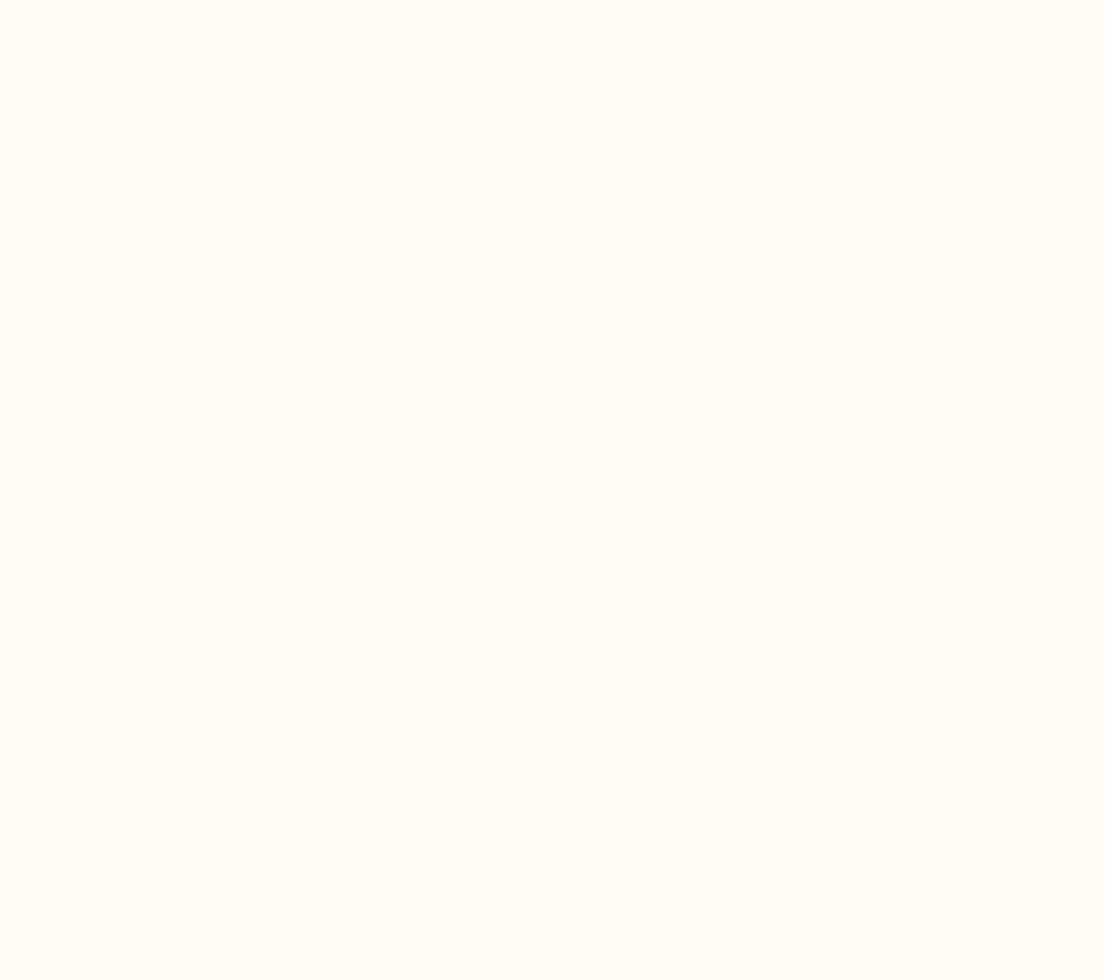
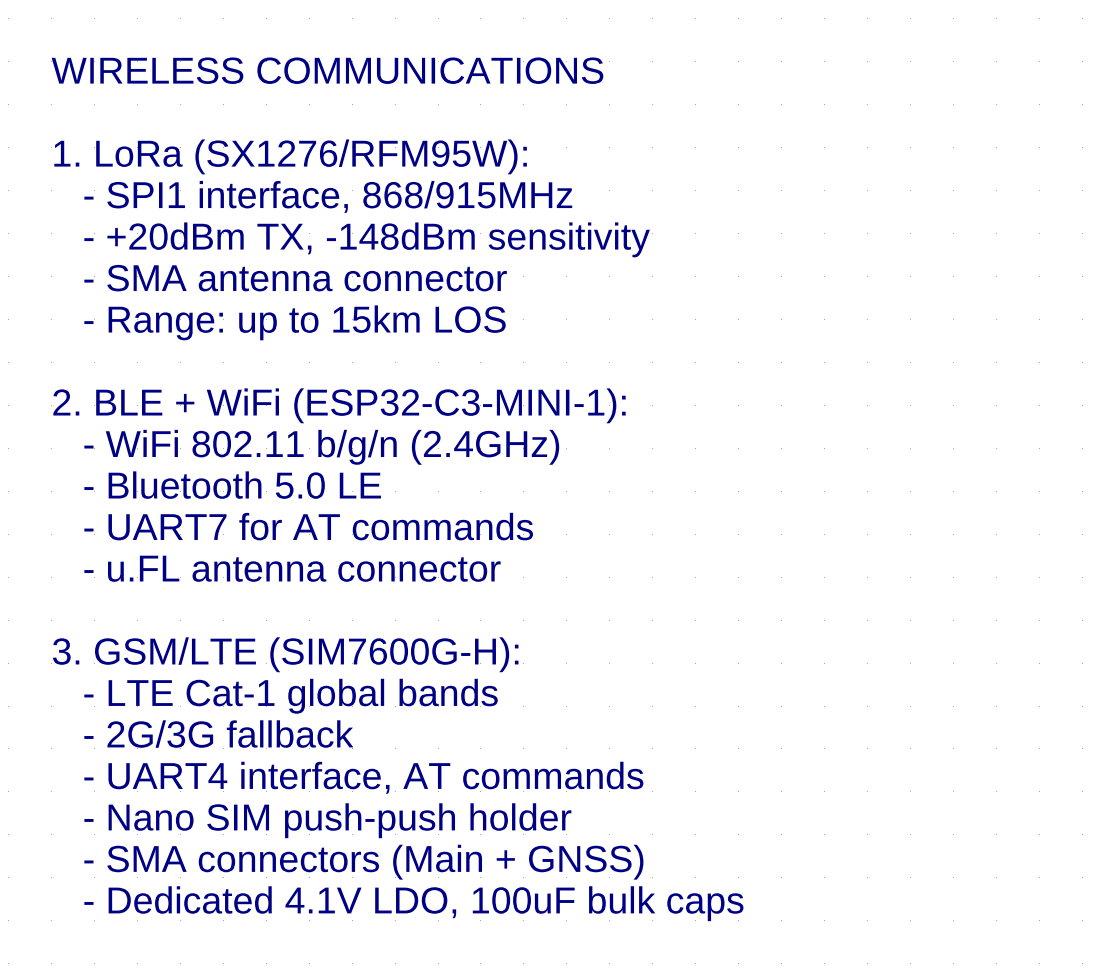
text: none -> WIRELESS COMMUNICATIONS (327, 70)
text: none -> 1. LoRa (SX1276/RFM95W): (290, 156)
text: none -> - SPI1 interface, 868/915MHz (328, 196)
text: none -> - +20dBm TX, -148dBm sensitivity (367, 239)
text: none -> - SMA antenna connector (295, 278)
text: none -> - Range: up to 15km LOS (295, 322)
text: none -> 2. BLE + WiFi (ESP32-C3-MINI-1): (339, 405)
text: none -> - WiFi 802.11 b/g/n (2.4GHz) (321, 447)
text: none -> - Bluetooth 5.0 LE (232, 485)
text: none -> - UART7 for AT commands (308, 526)
text: none -> - u.FL antenna connector (292, 568)
text: none -> 3. GSM/LTE (SIM7600G-H): (285, 654)
text: none -> - LTE Cat-1 global bands (291, 696)
text: none -> - 2G/3G fallback (218, 734)
text: none -> - UART4 interface, AT commands (363, 777)
text: none -> - Nano SIM push-push holder (327, 820)
text: none -> - SMA connectors (Main + GNSS) (363, 862)
text: none -> - Dedicated 4.1V LDO, 100uF bulk caps (413, 903)

